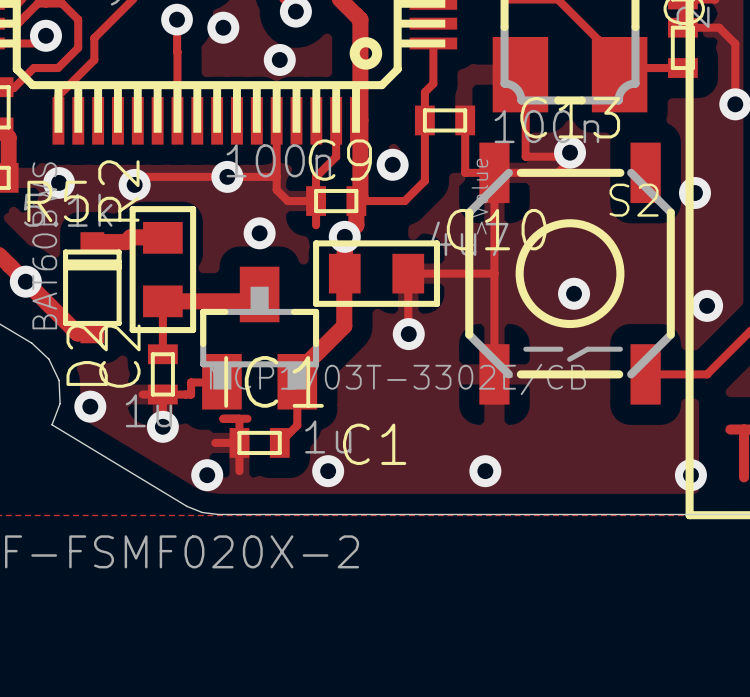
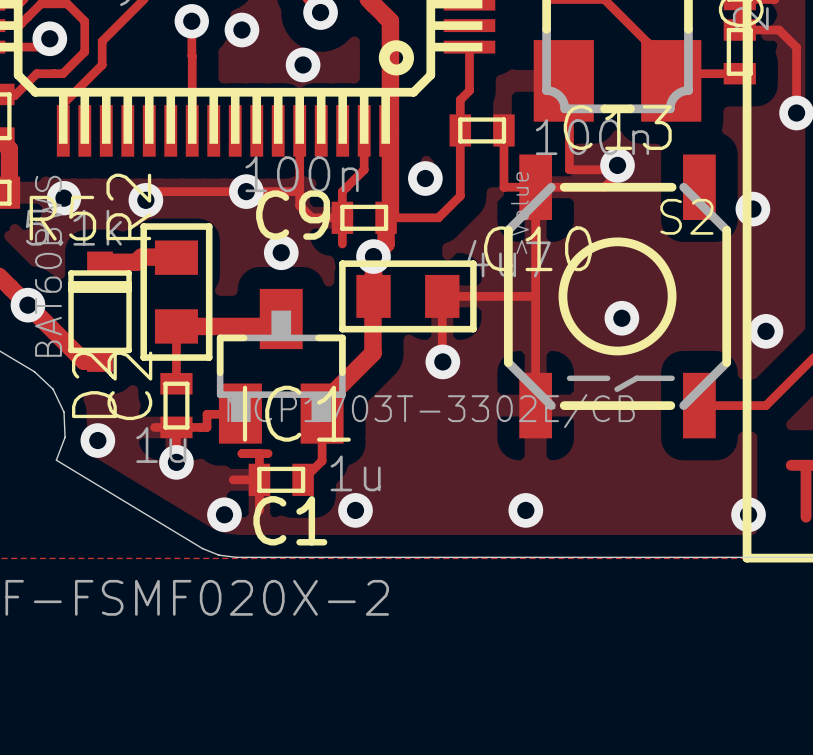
C9 name position: C9 (340, 160) -> C9 (293, 215)
C1 name position: C1 (374, 444) -> C1 (290, 520)

